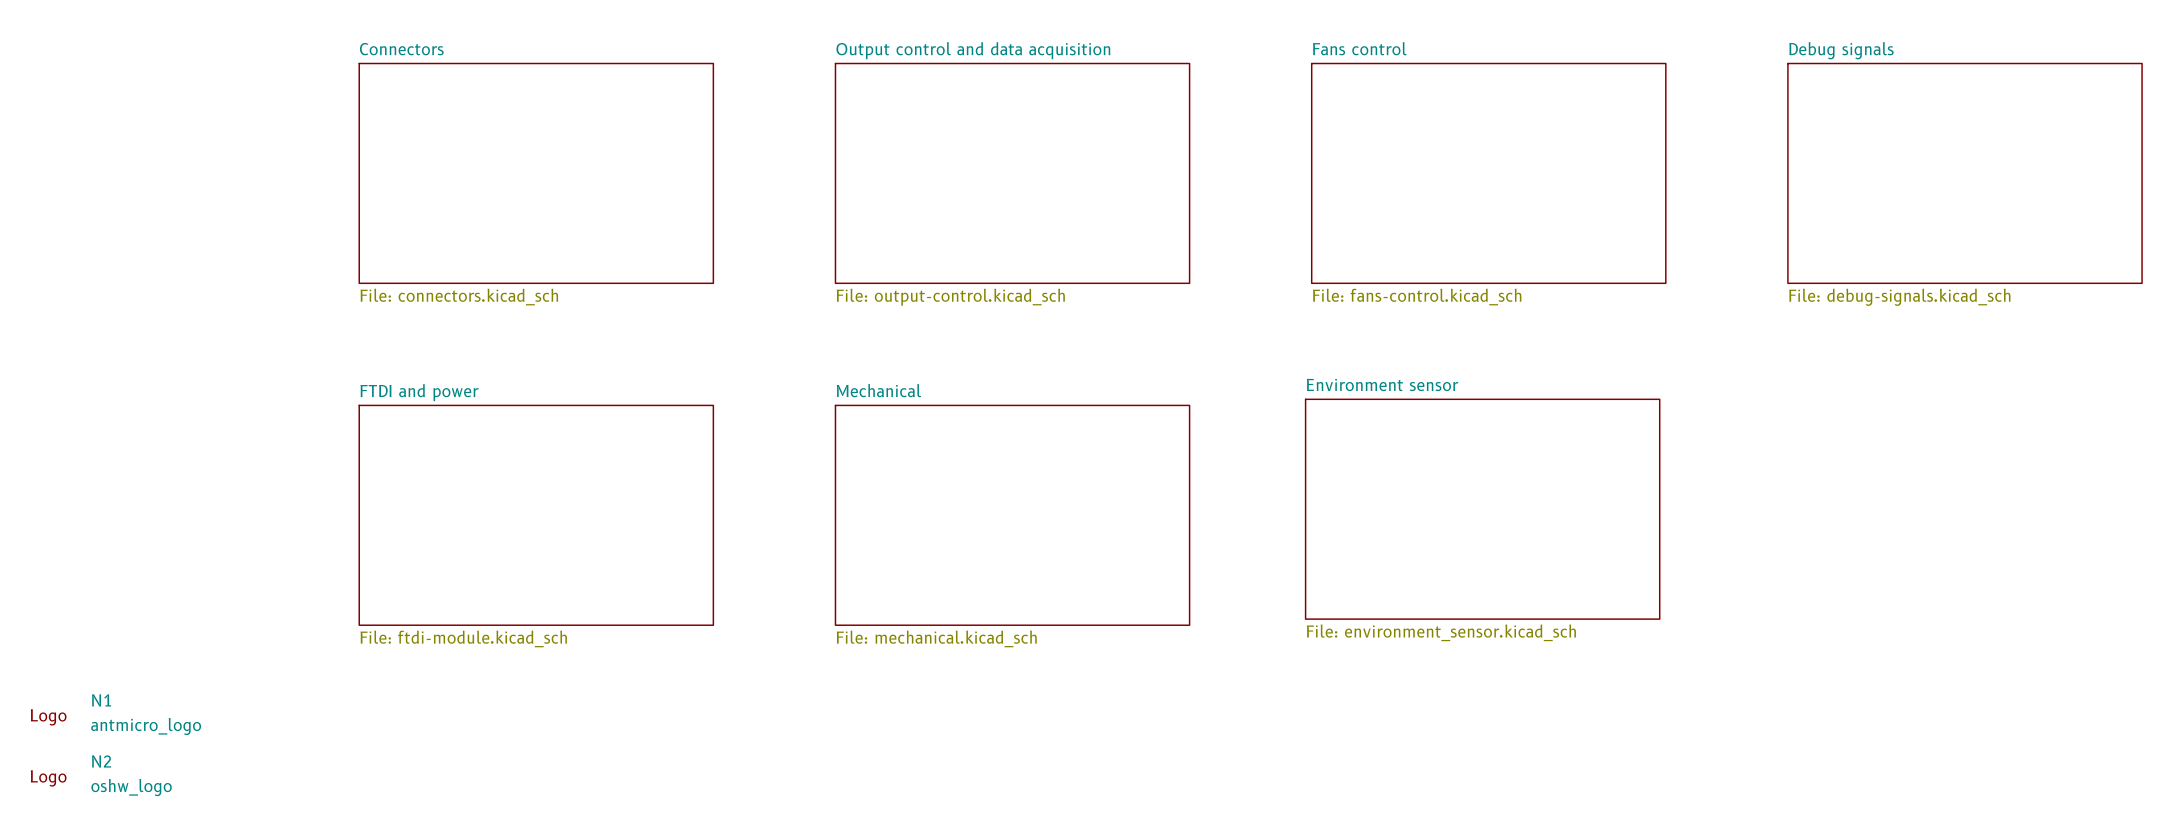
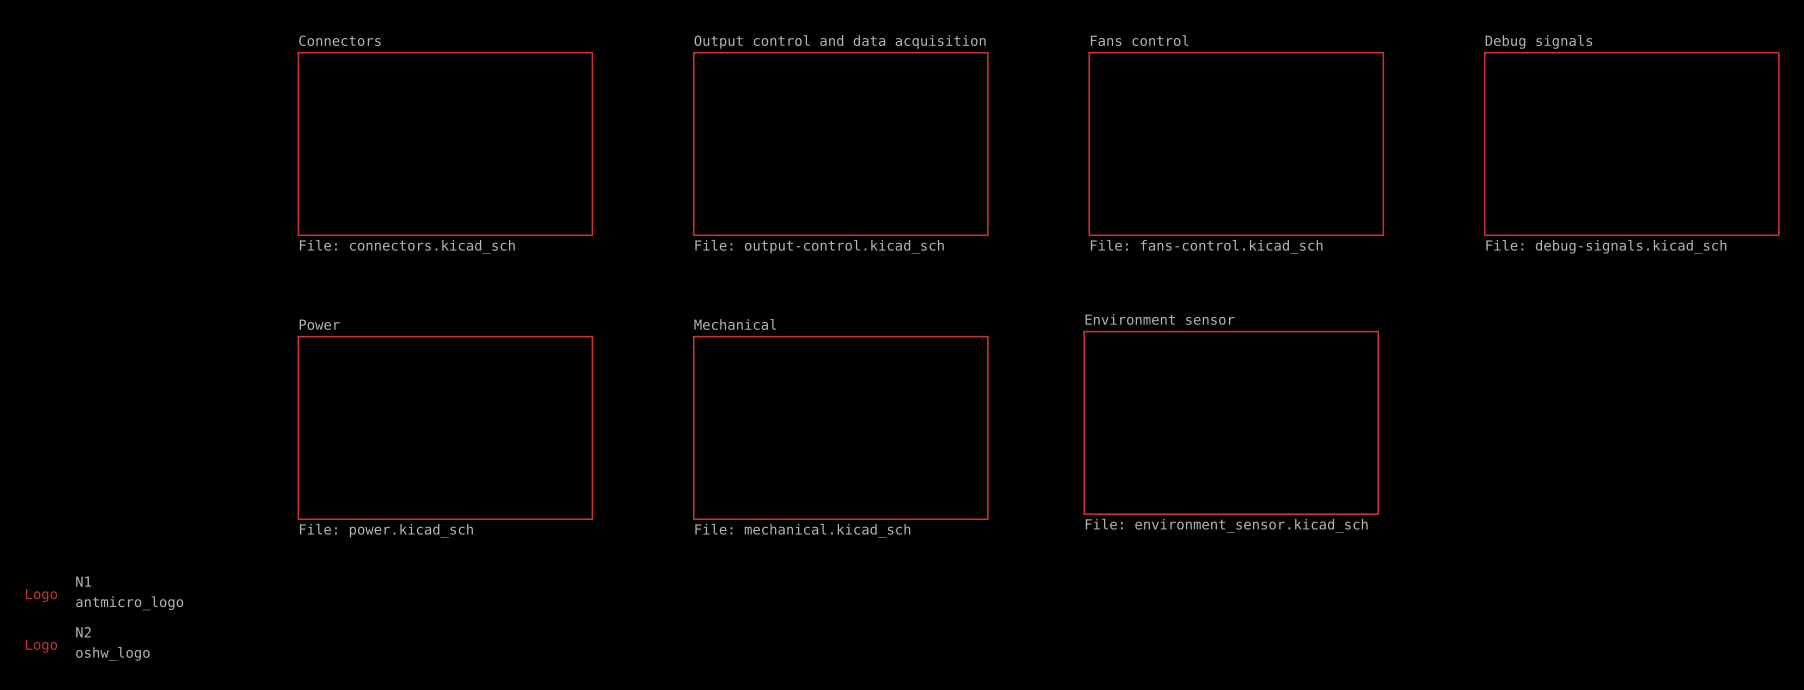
sheet FTDI and power name: FTDI and power (419, 392) -> Power (319, 324)
sheet FTDI and power value: File: ftdi-module.kicad_sch (463, 638) -> File: power.kicad_sch (386, 530)

